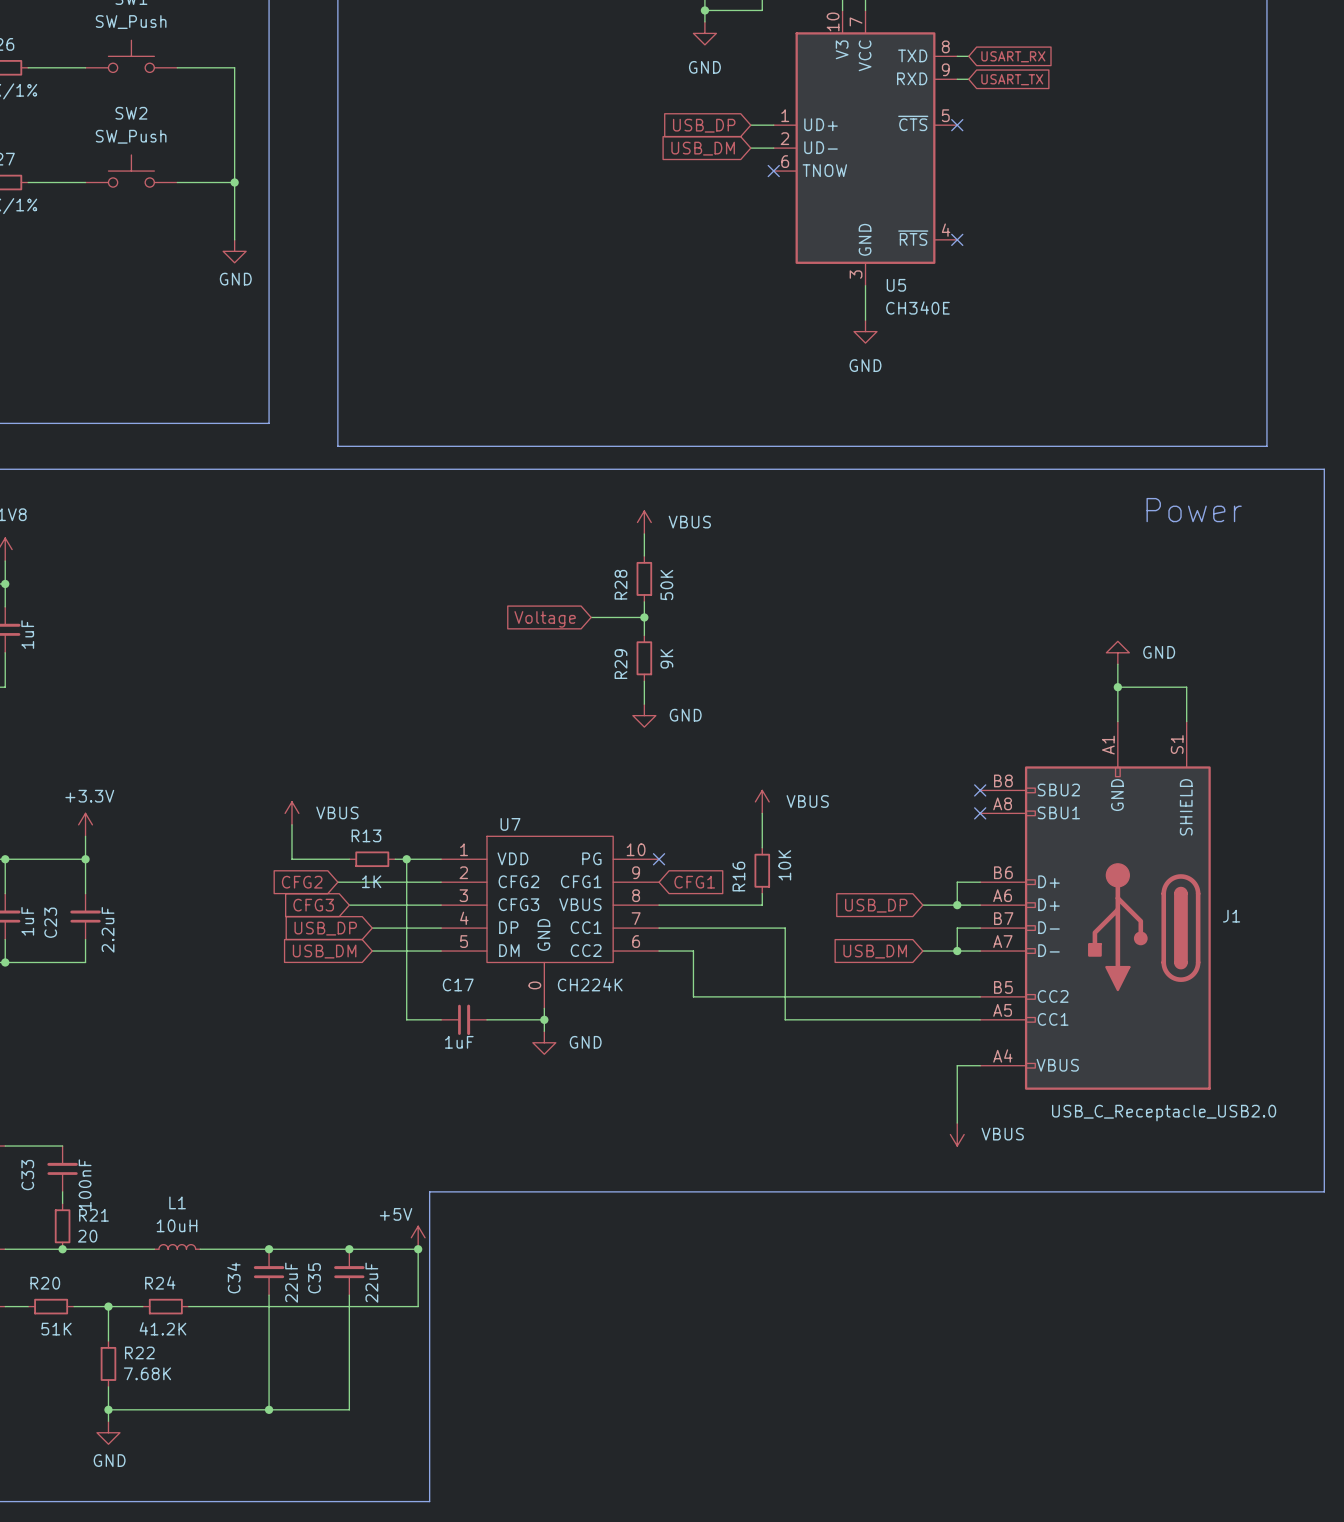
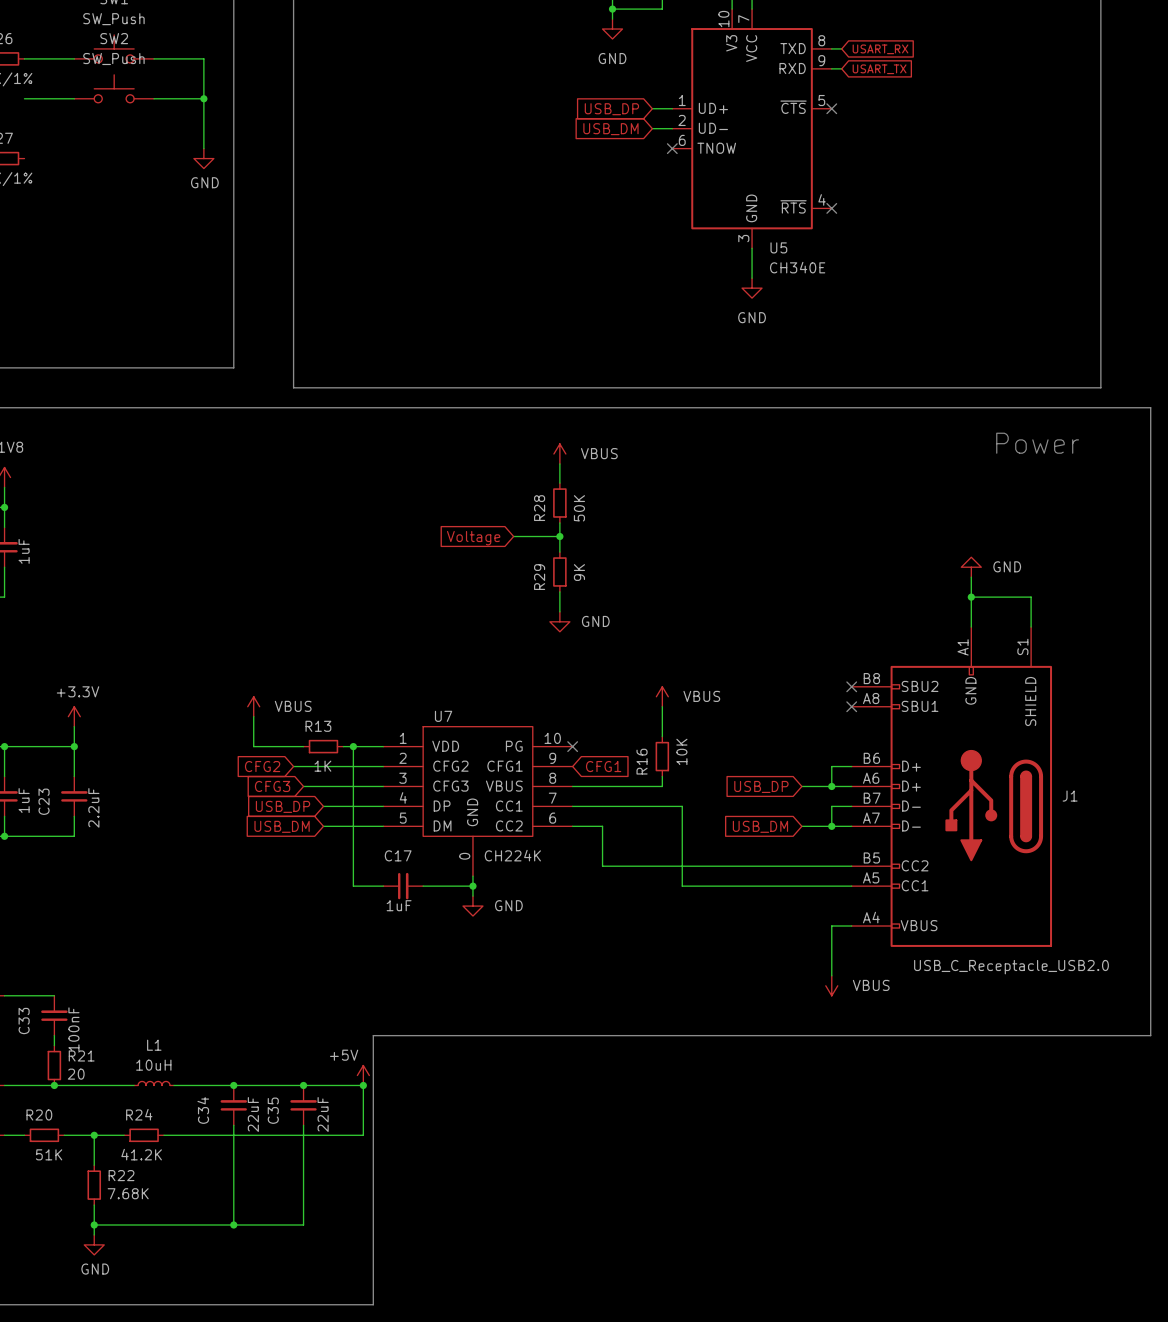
junction: none -> (203, 98)
SW2 position: (131, 171) -> (114, 88)
wire: (234, 171) (234, 239) -> none
wire: (28, 182) (85, 182) -> (24, 98) (74, 98)
wire: (177, 182) (234, 182) -> (154, 98) (203, 98)
junction: (234, 182) -> none
power symbol position: GND (234, 251) -> GND (203, 158)

